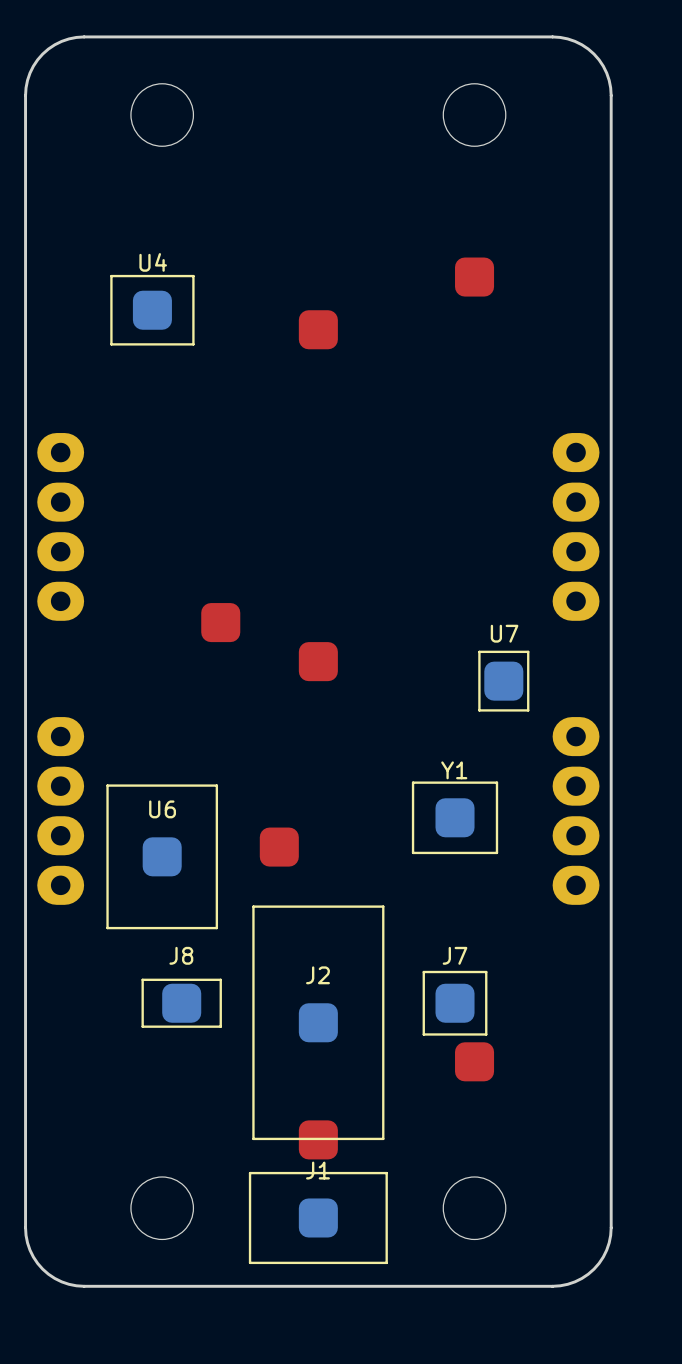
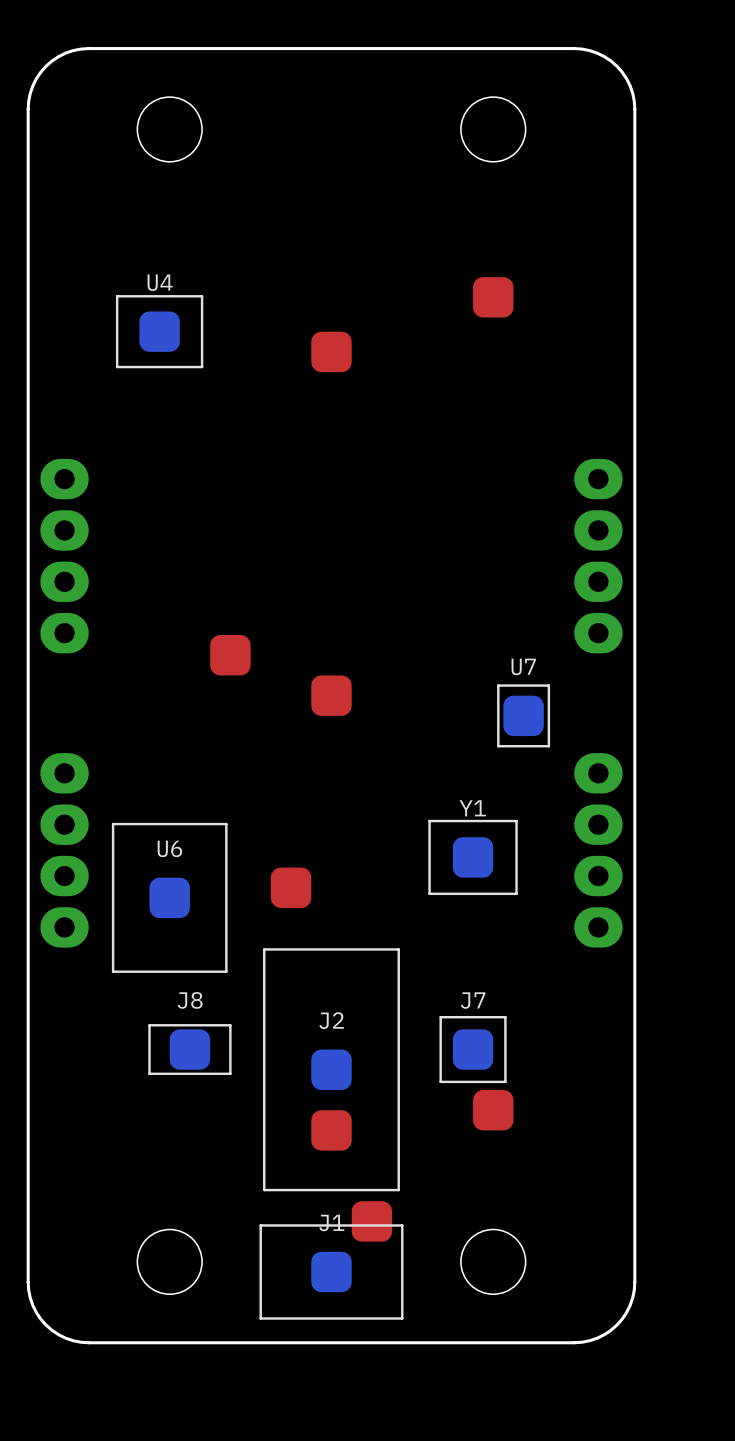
part: none -> (331, 1130)
part: (318, 1139) -> none
part: none -> (371, 1221)

